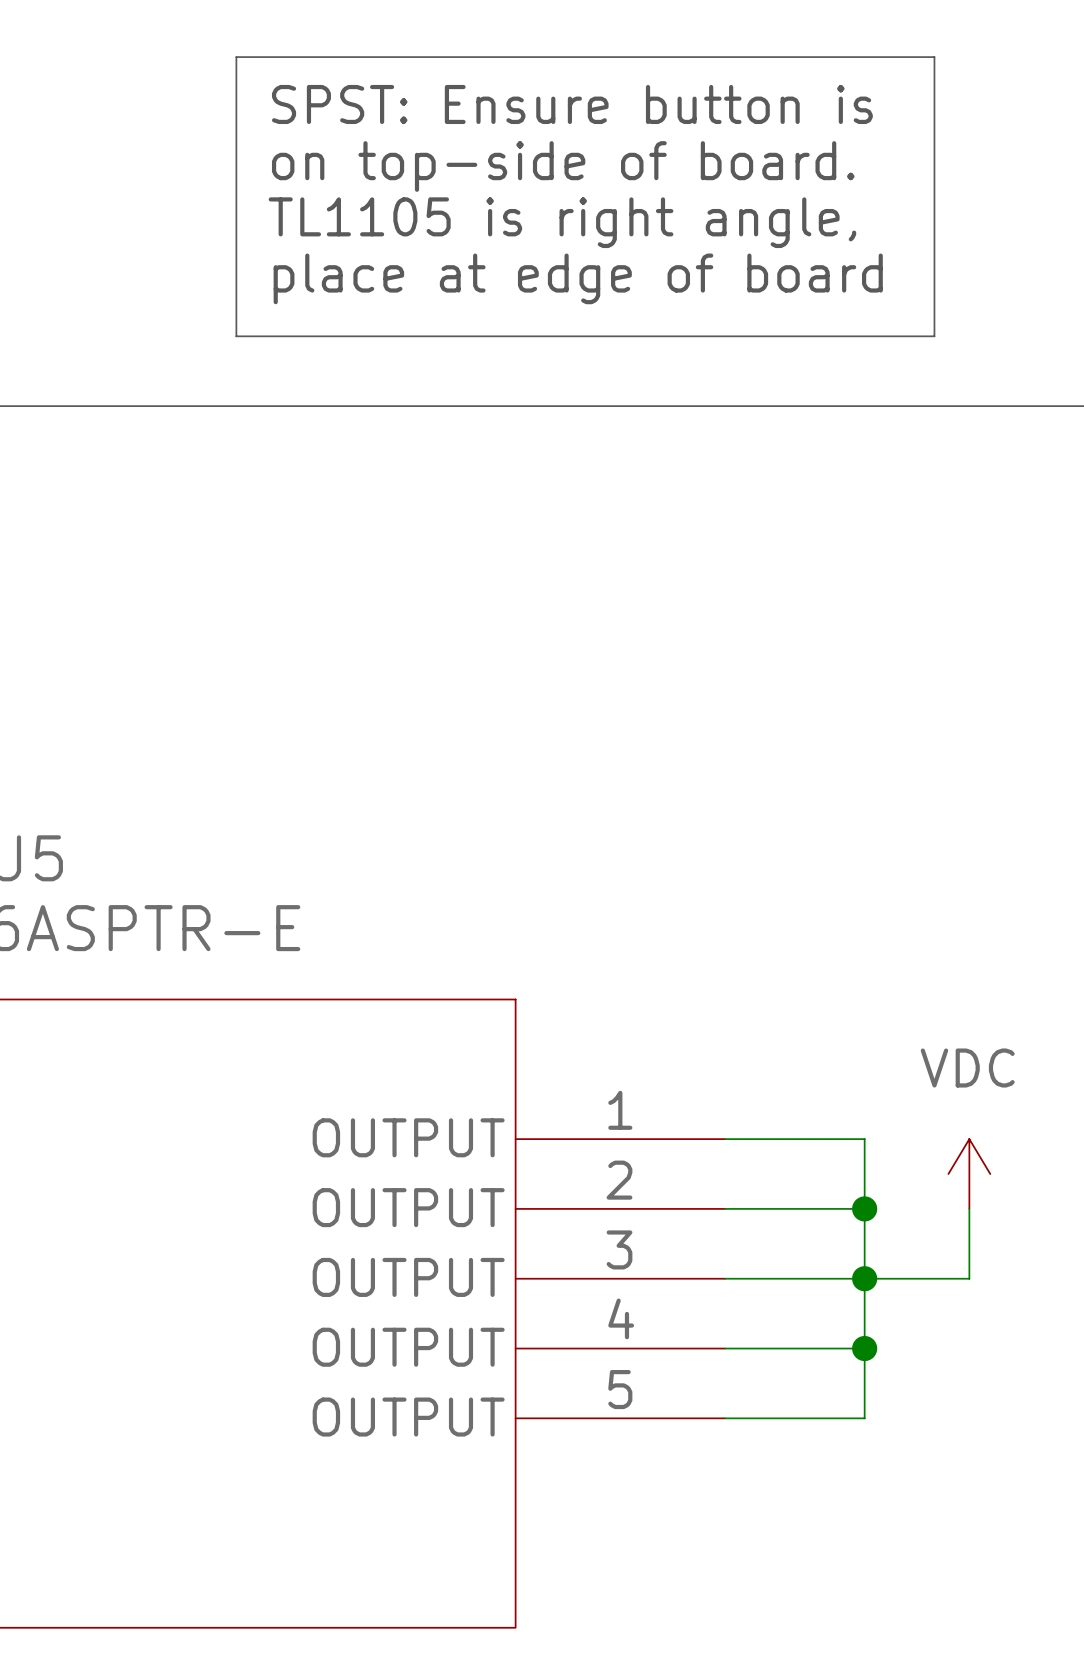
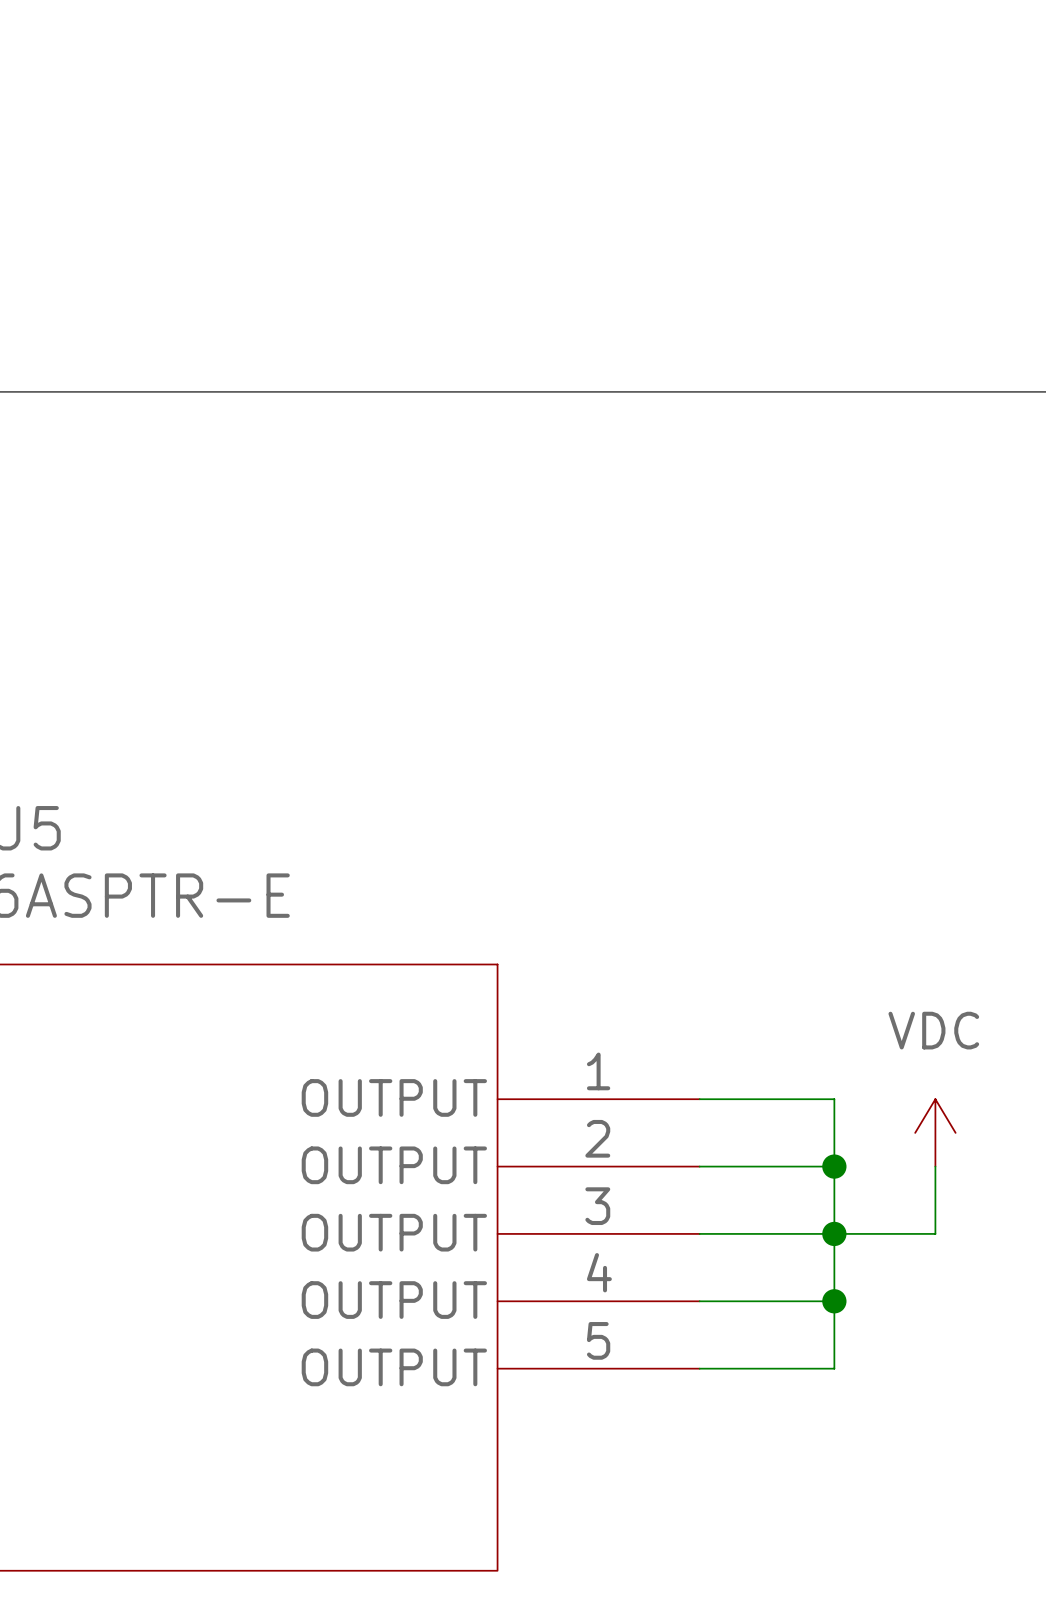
line: (236, 57) (934, 57) (934, 336) (236, 336) (236, 57) -> none
text: SPST: Ensure button is (572, 104) -> none
text: on top-side of board. (563, 166) -> none
text: TL1105 is right angle, (562, 222) -> none
text: place at edge of board (578, 278) -> none

